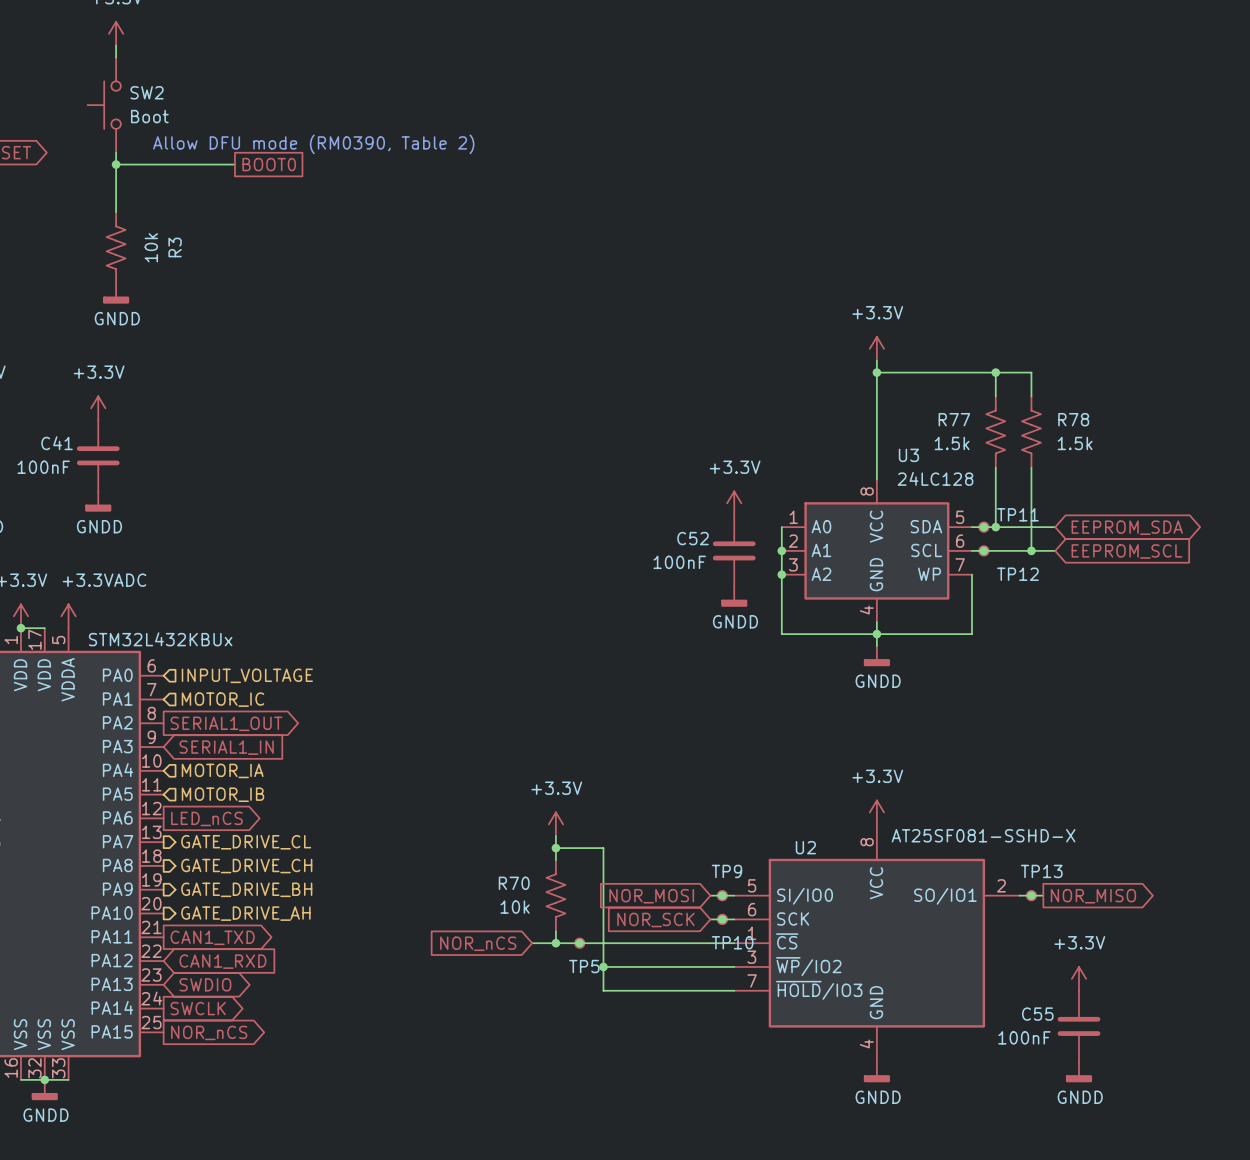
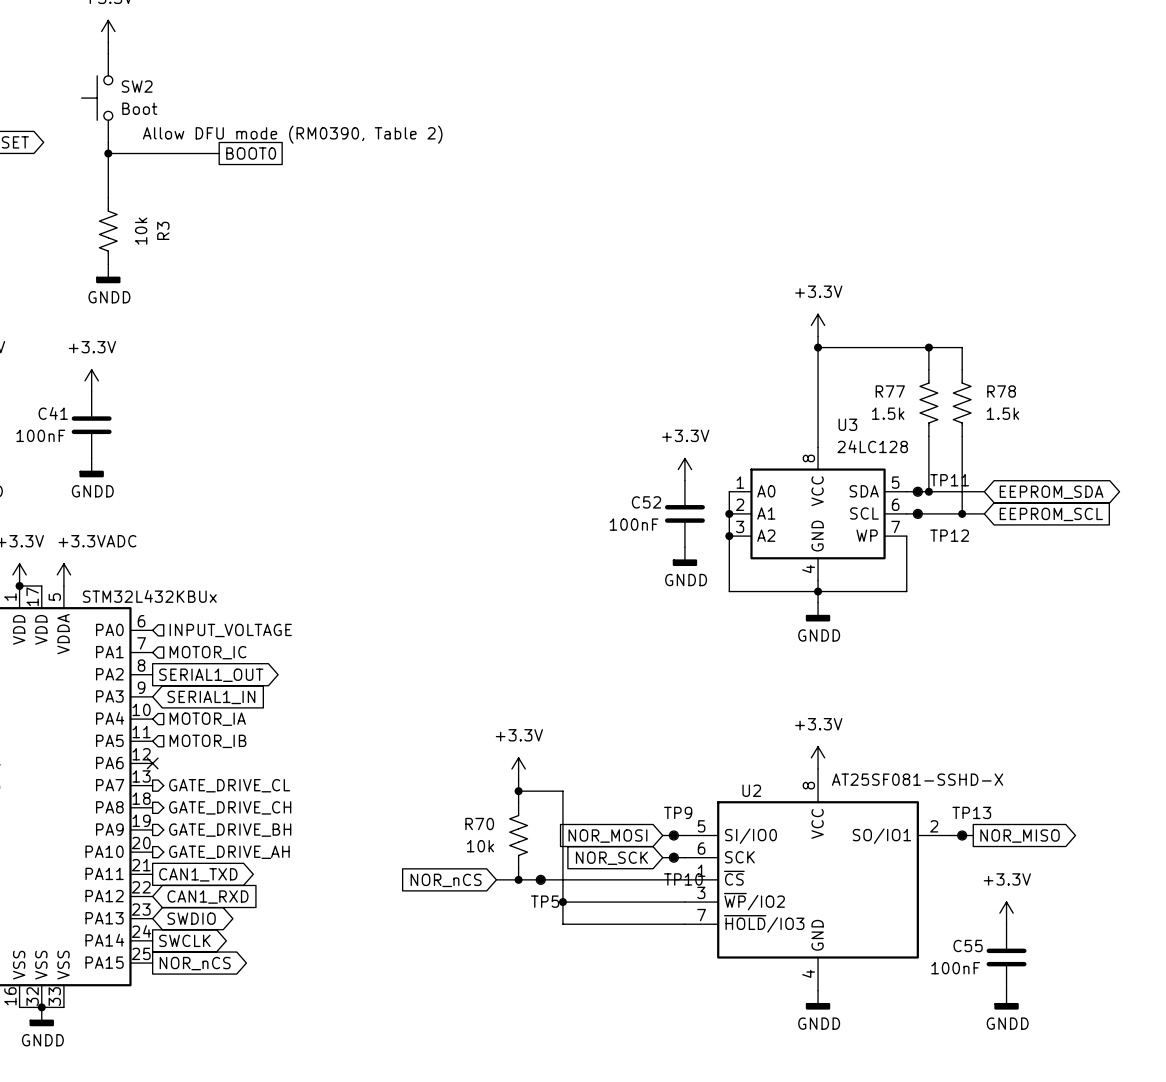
no-connect mark: none -> (152, 763)
global label: LED_nCS (206, 818) -> none

